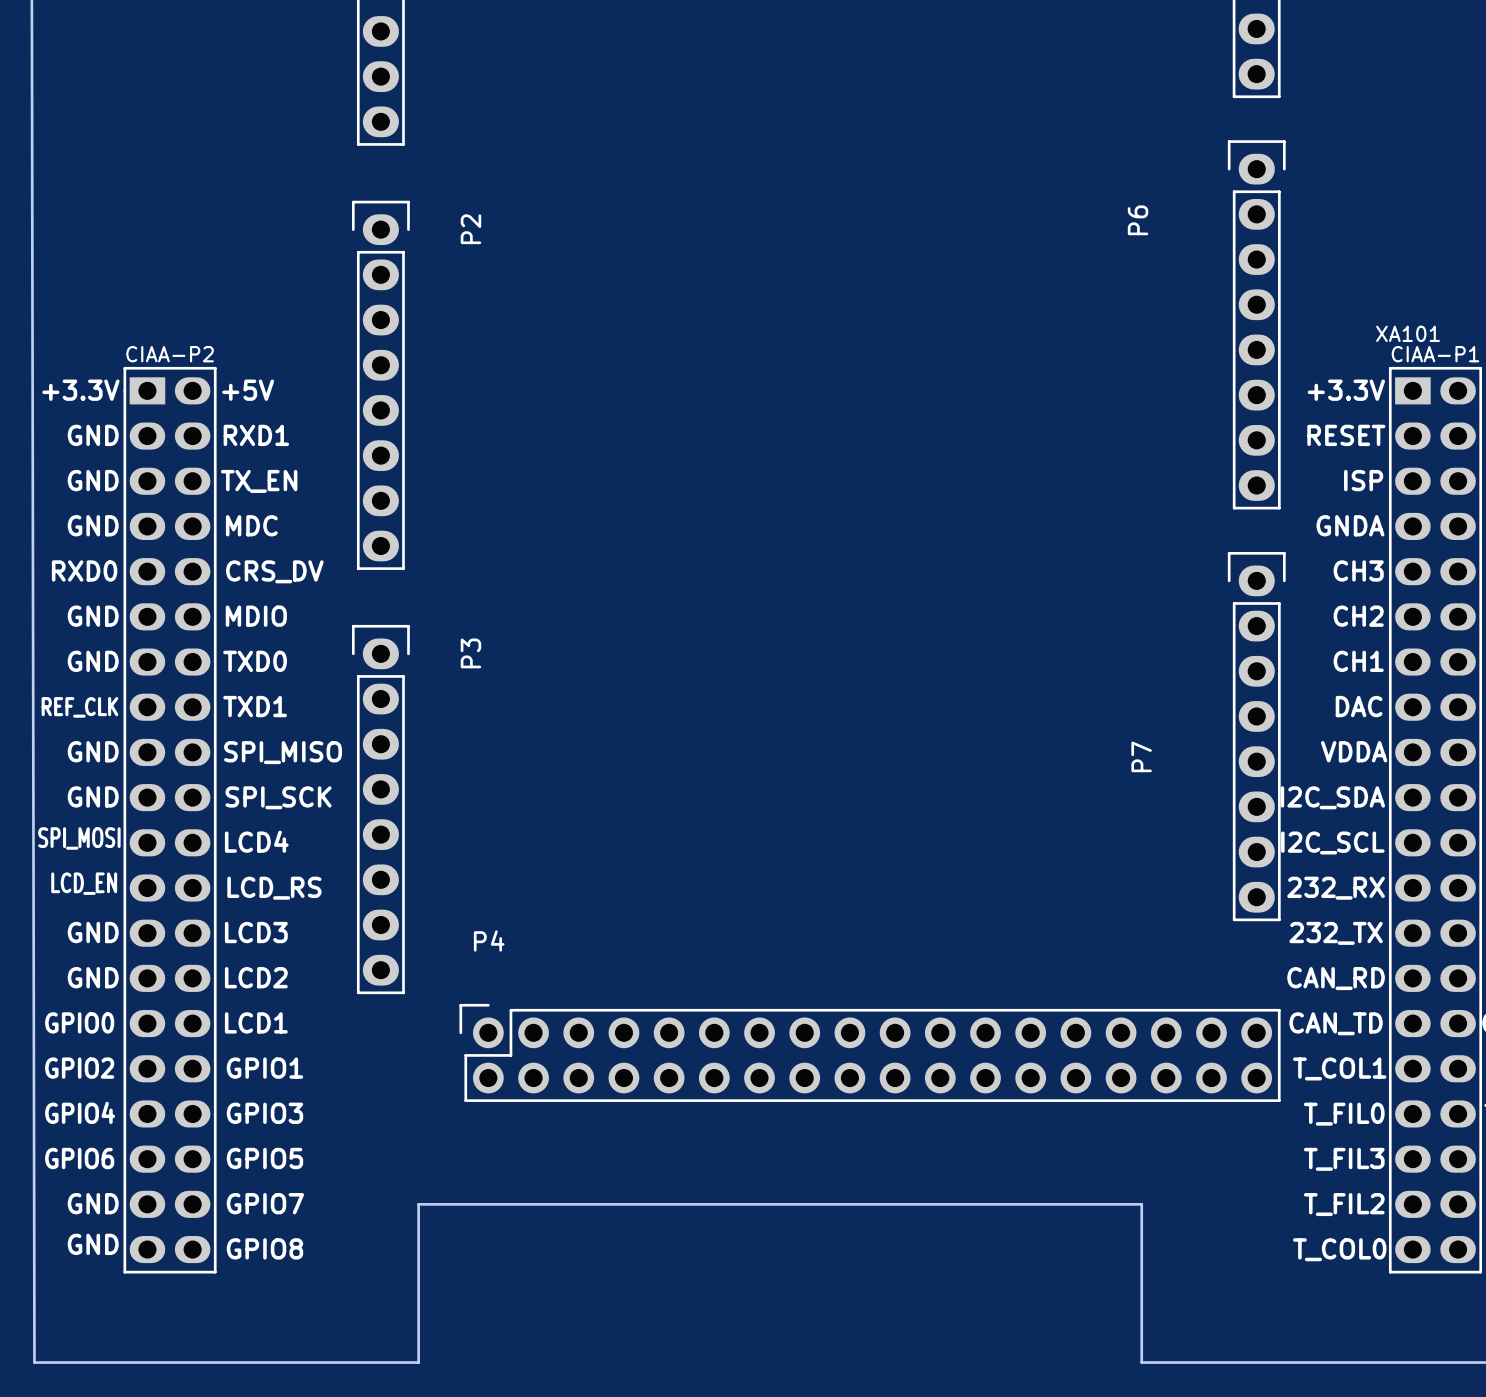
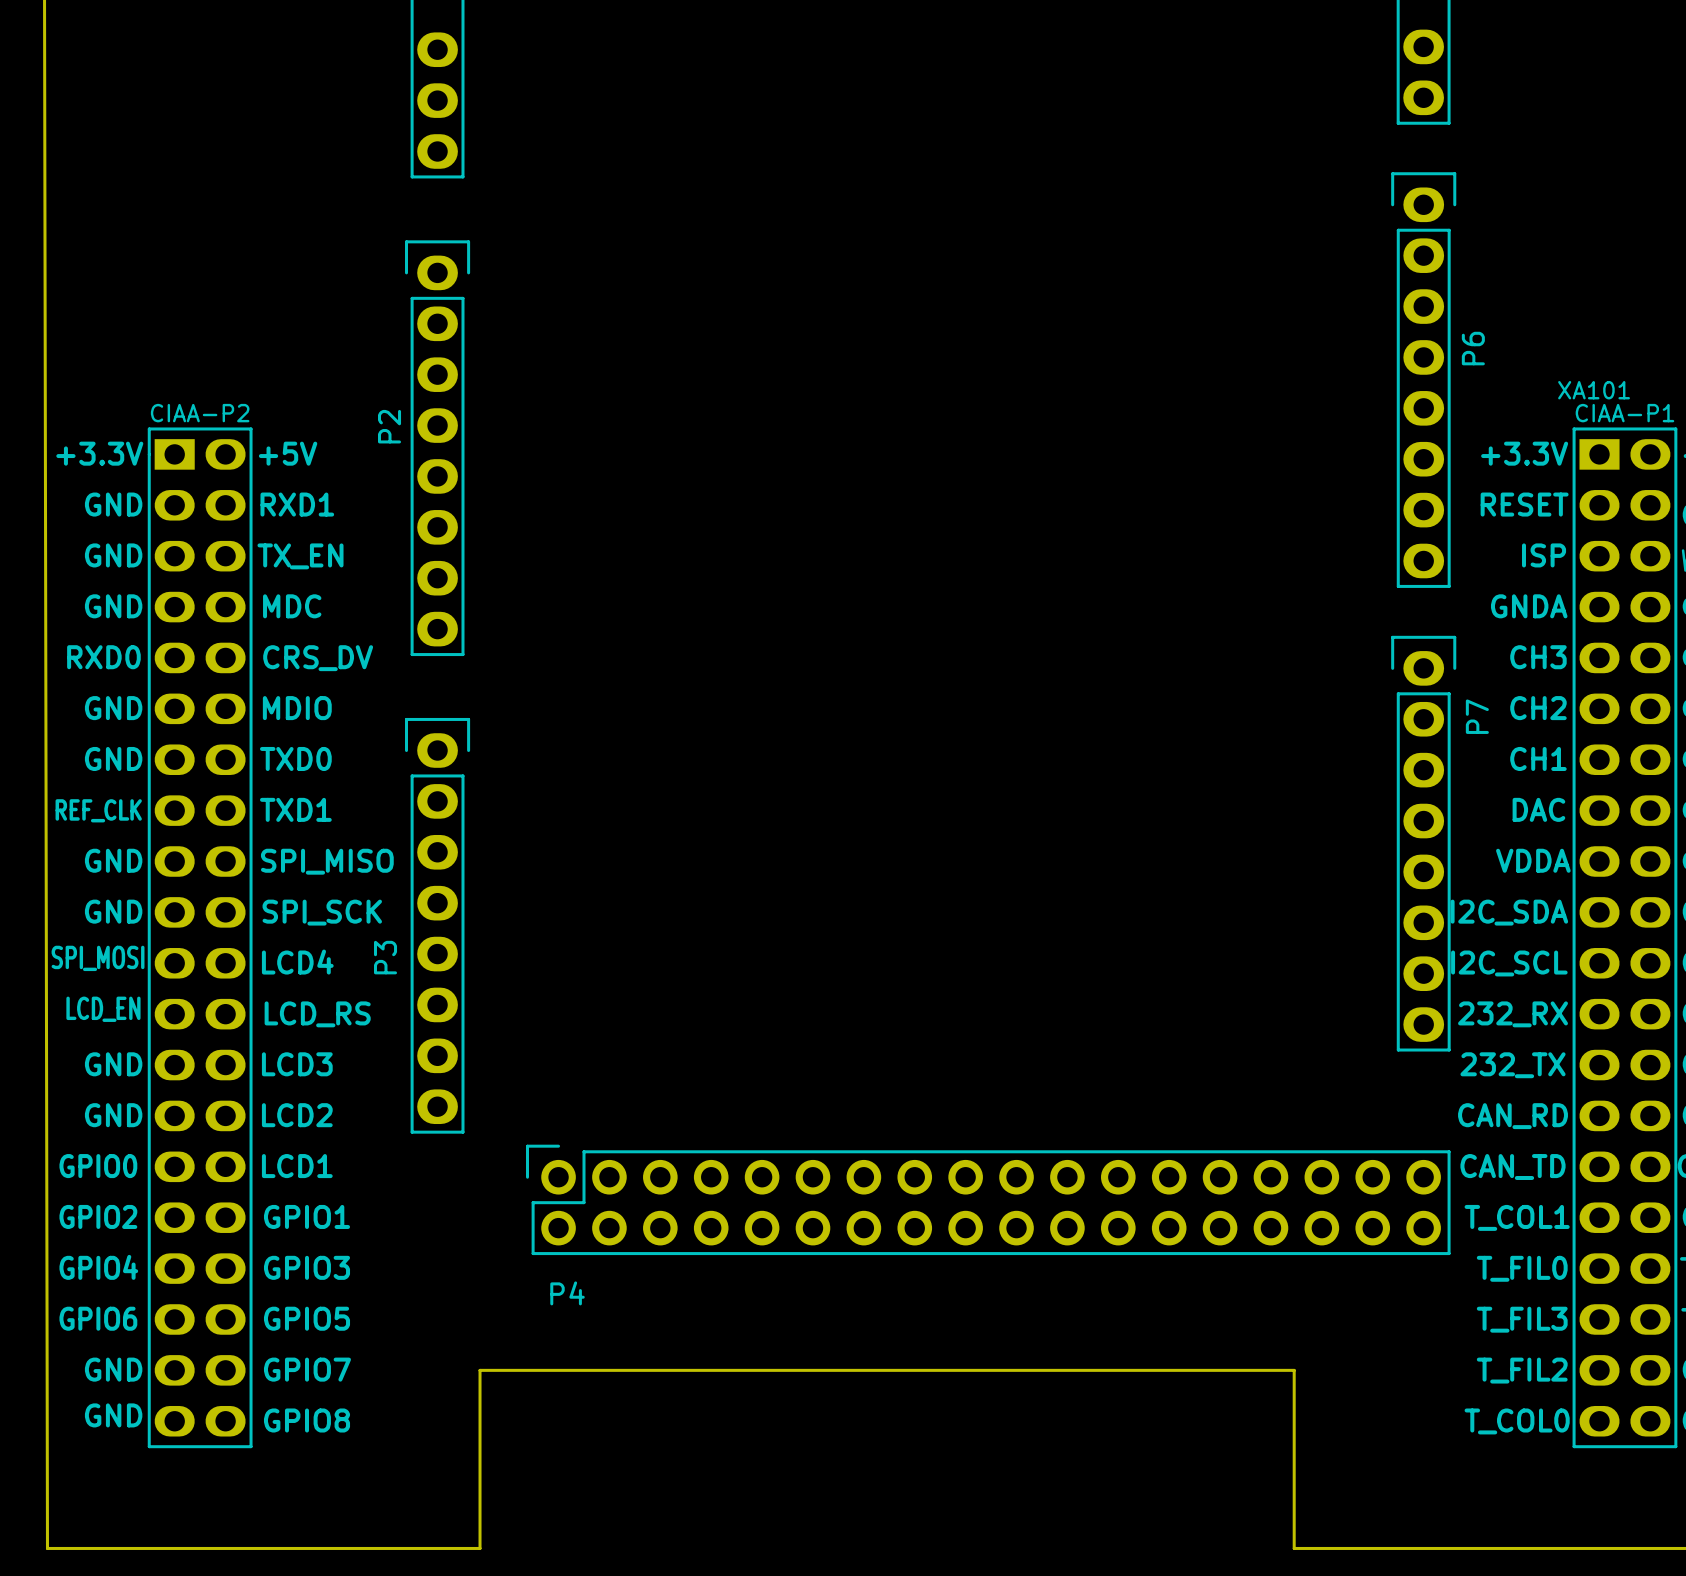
P6 name position: P6 (1138, 220) -> P6 (1473, 348)
P2 name position: P2 (470, 229) -> P2 (389, 426)
P3 name position: P3 (470, 653) -> P3 (385, 957)
P7 name position: P7 (1141, 756) -> P7 (1477, 716)
P4 name position: P4 (489, 941) -> P4 (567, 1293)

